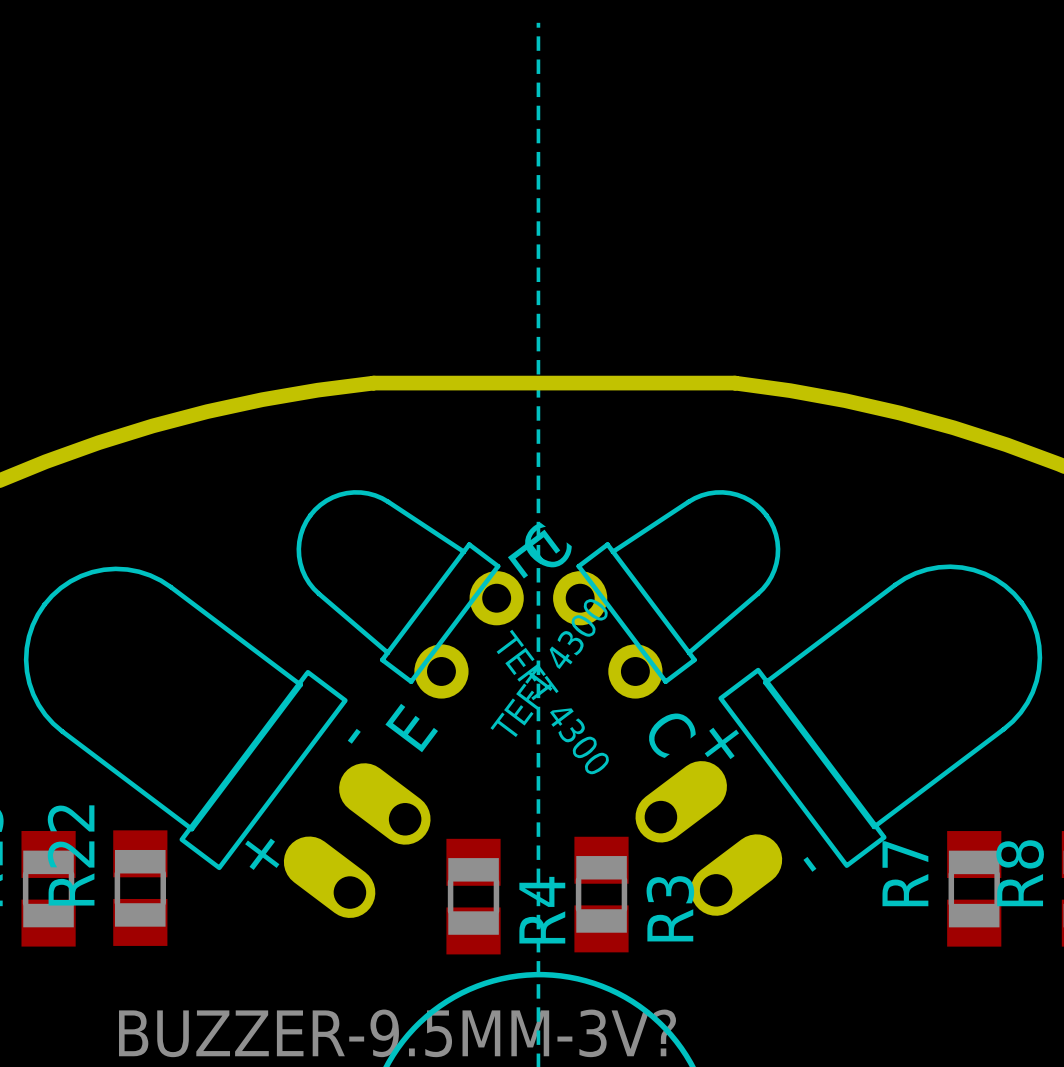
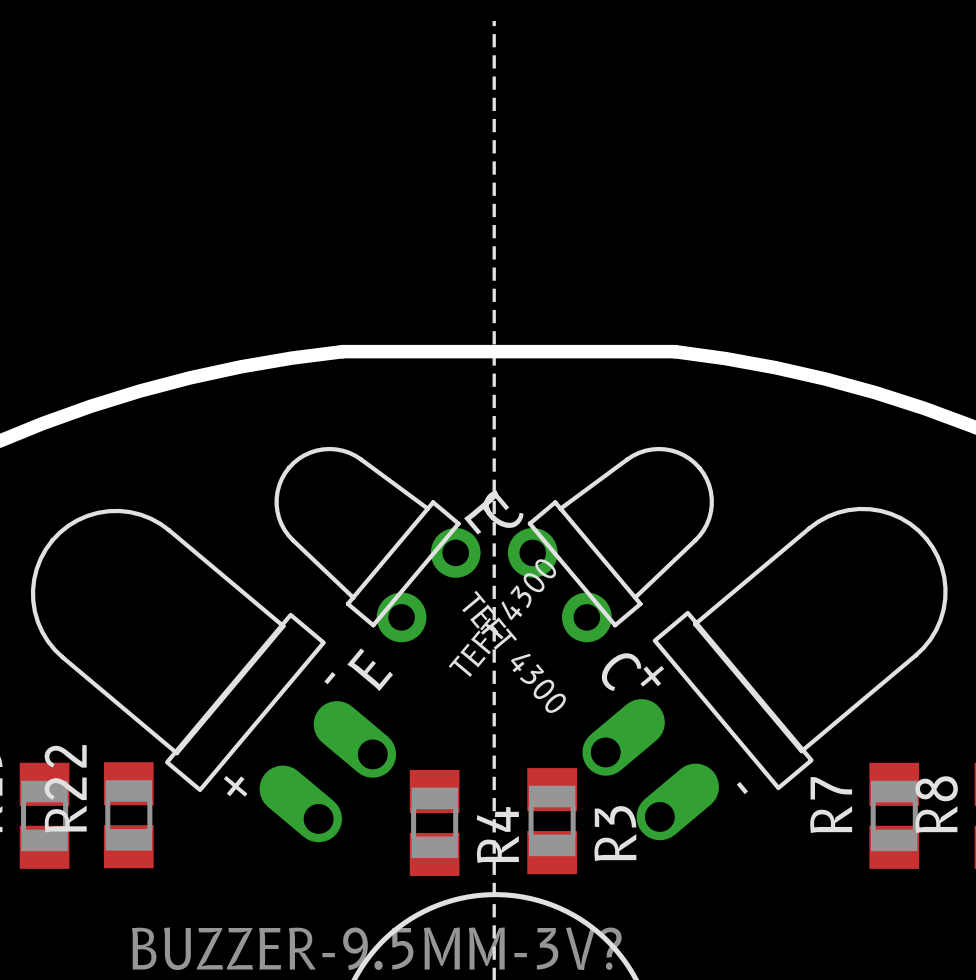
part rotation: 0° (410, 594) -> 3° clockwise (377, 544)
part rotation: 0° (666, 594) -> 3° counterclockwise (610, 544)
part rotation: 0° (838, 740) -> 3° counterclockwise (765, 673)
part rotation: 0° (227, 742) -> 3° clockwise (213, 675)

